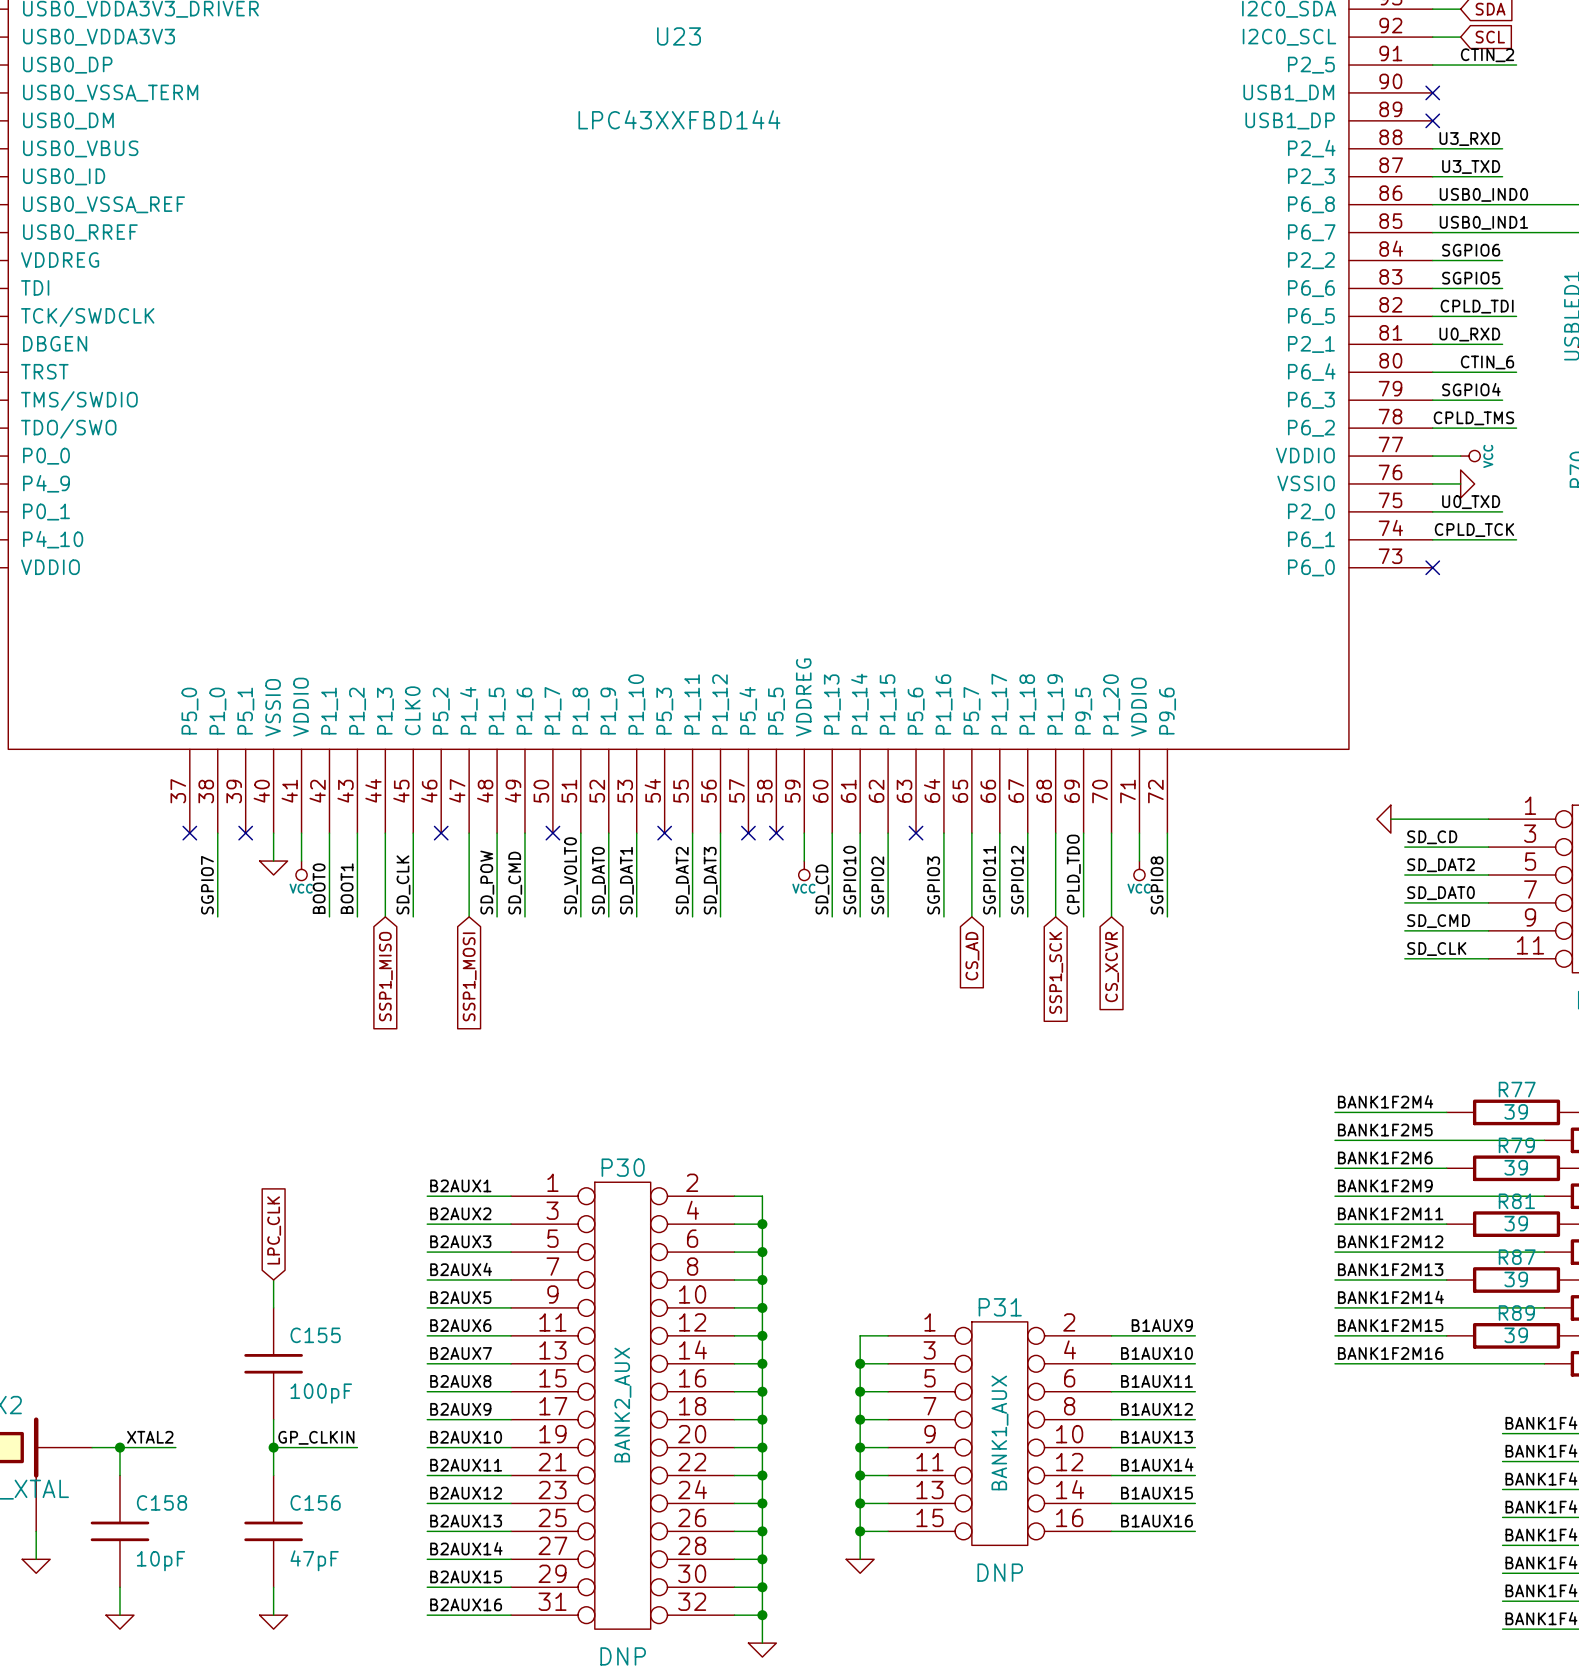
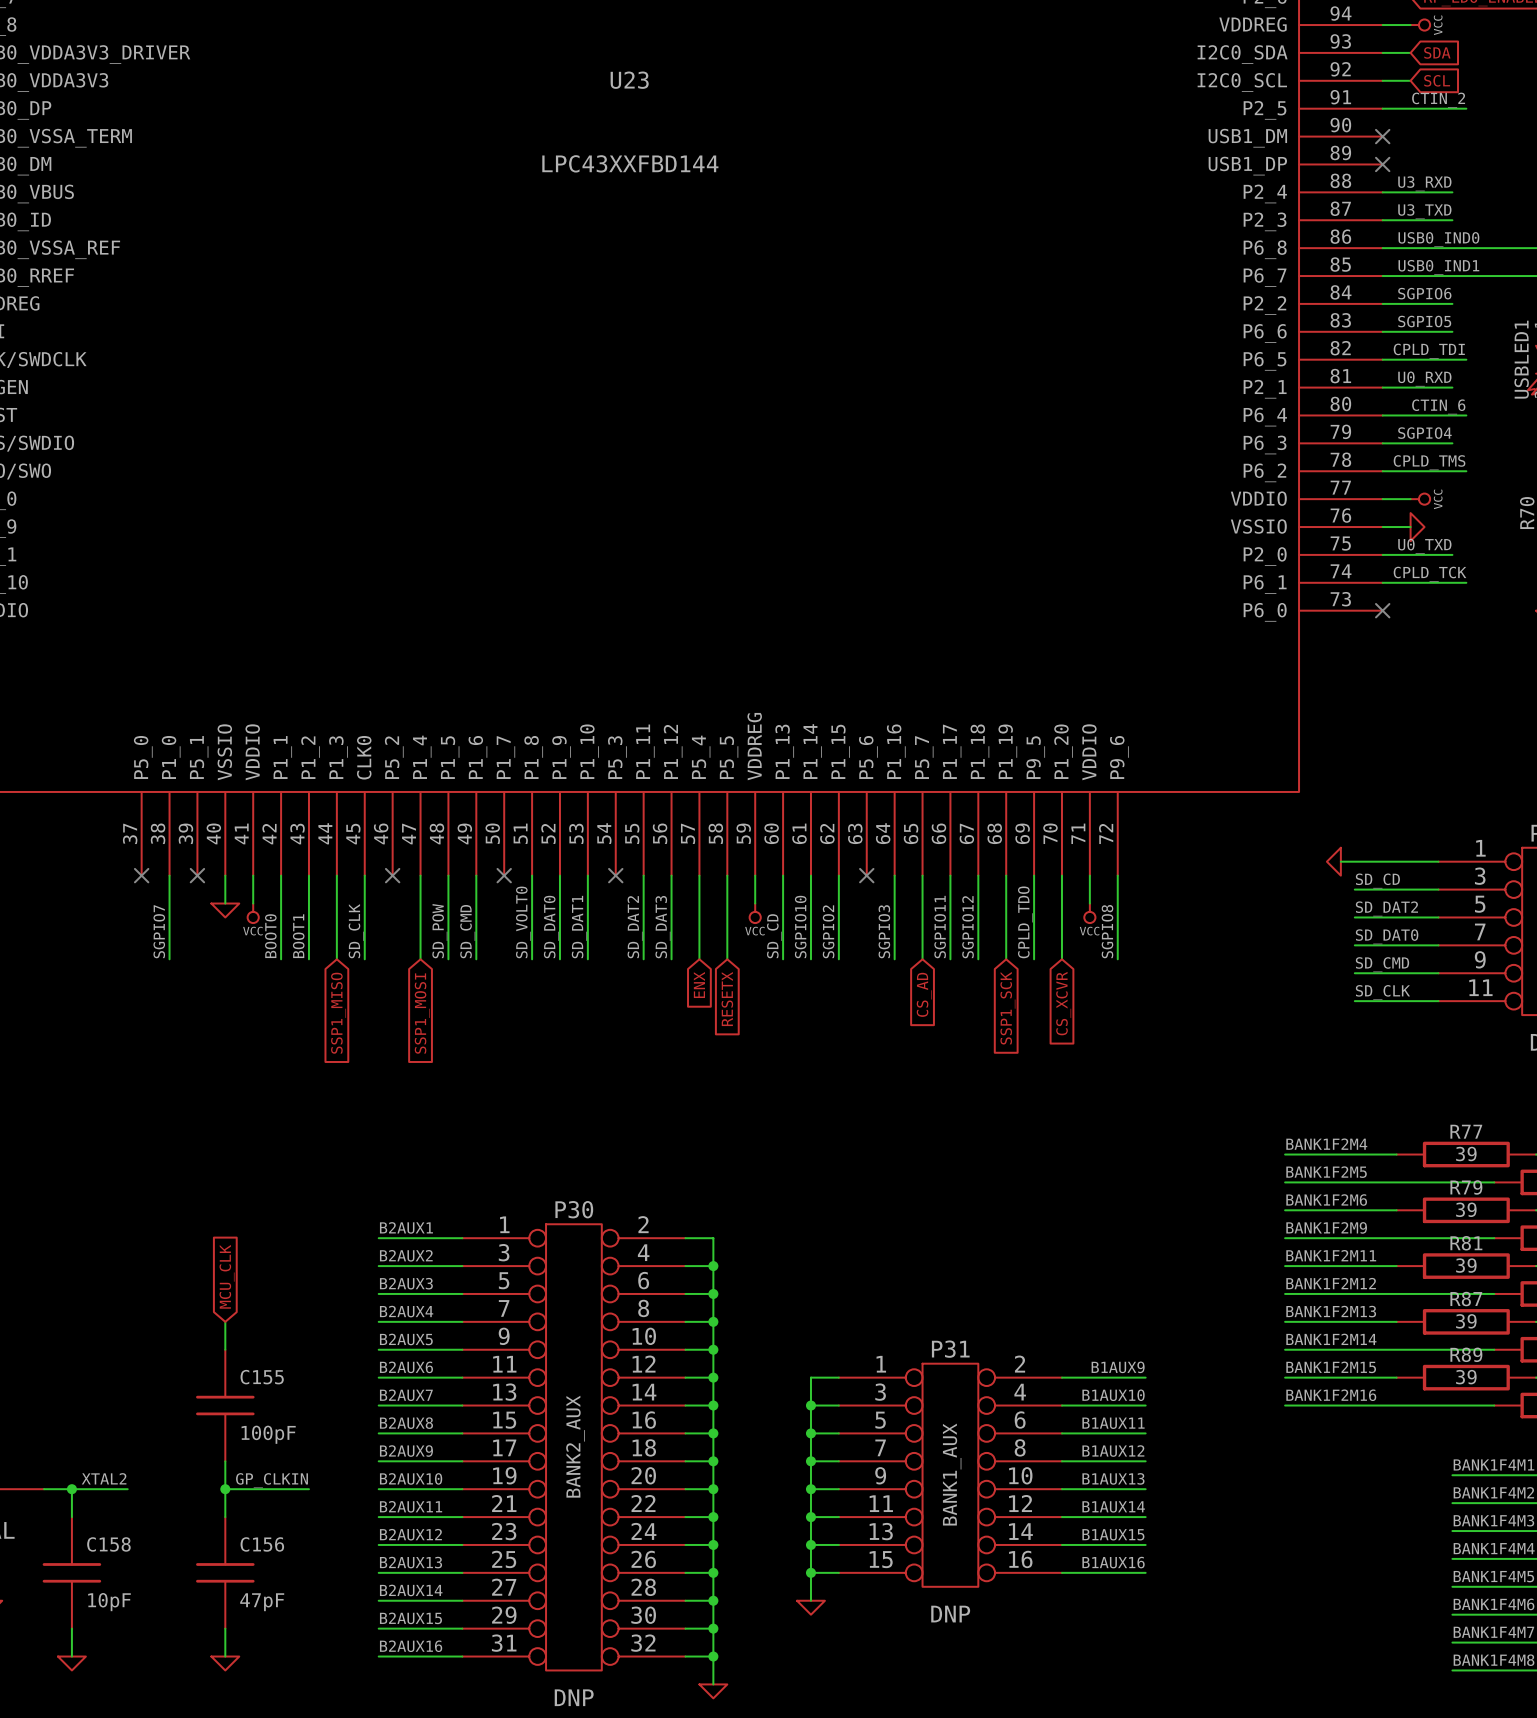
wire: none -> (699, 875) (699, 959)
no-connect mark: (748, 833) -> none
wire: none -> (727, 875) (727, 959)
no-connect mark: (776, 833) -> none
global label: none -> ENX (699, 985)
global label: none -> RESETX (727, 999)
global label: LPC_CLK (274, 1230) -> MCU_CLK (227, 1276)

